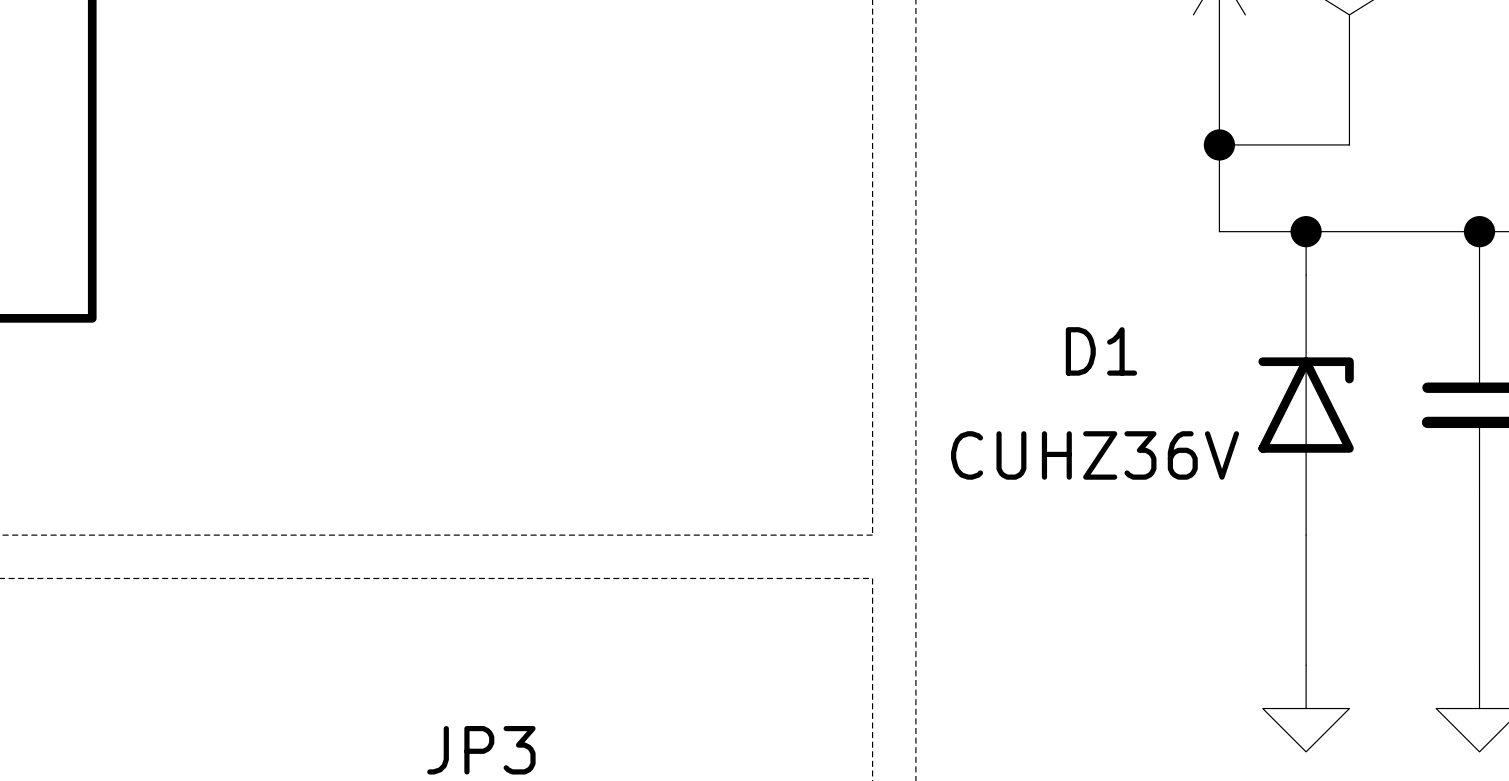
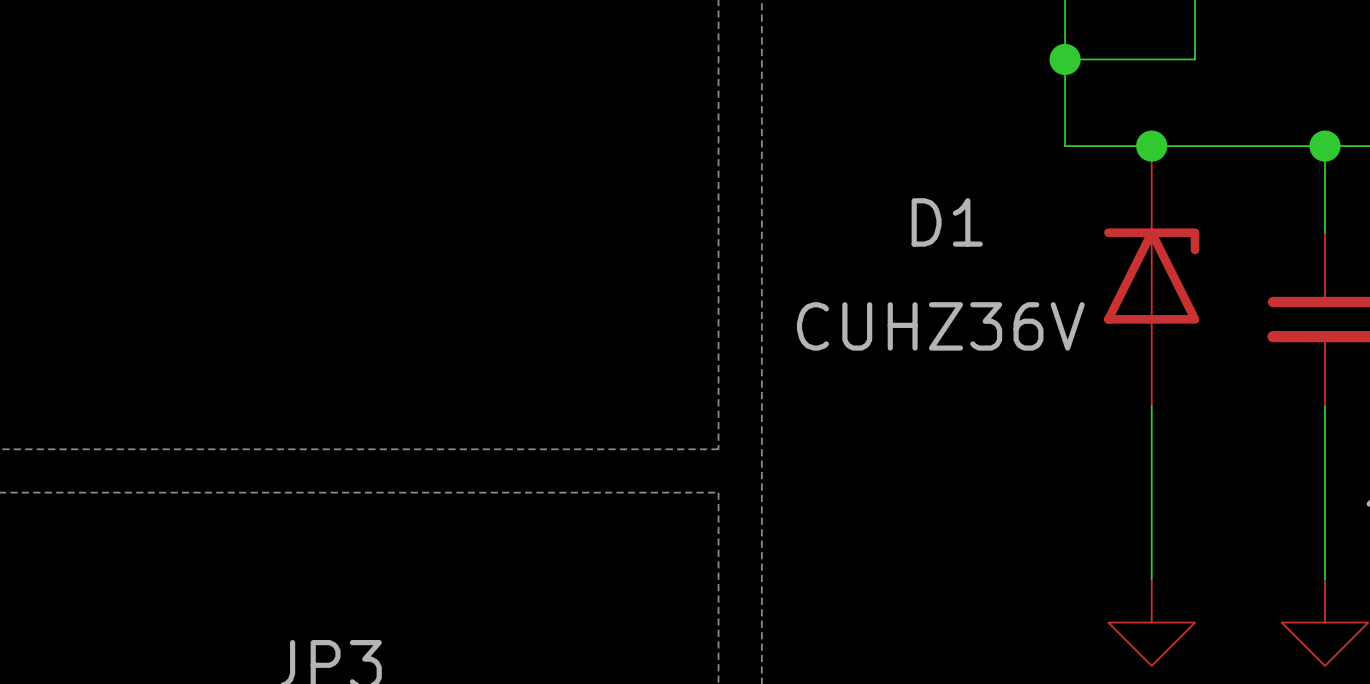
D1 position: (1306, 405) -> (1151, 276)

